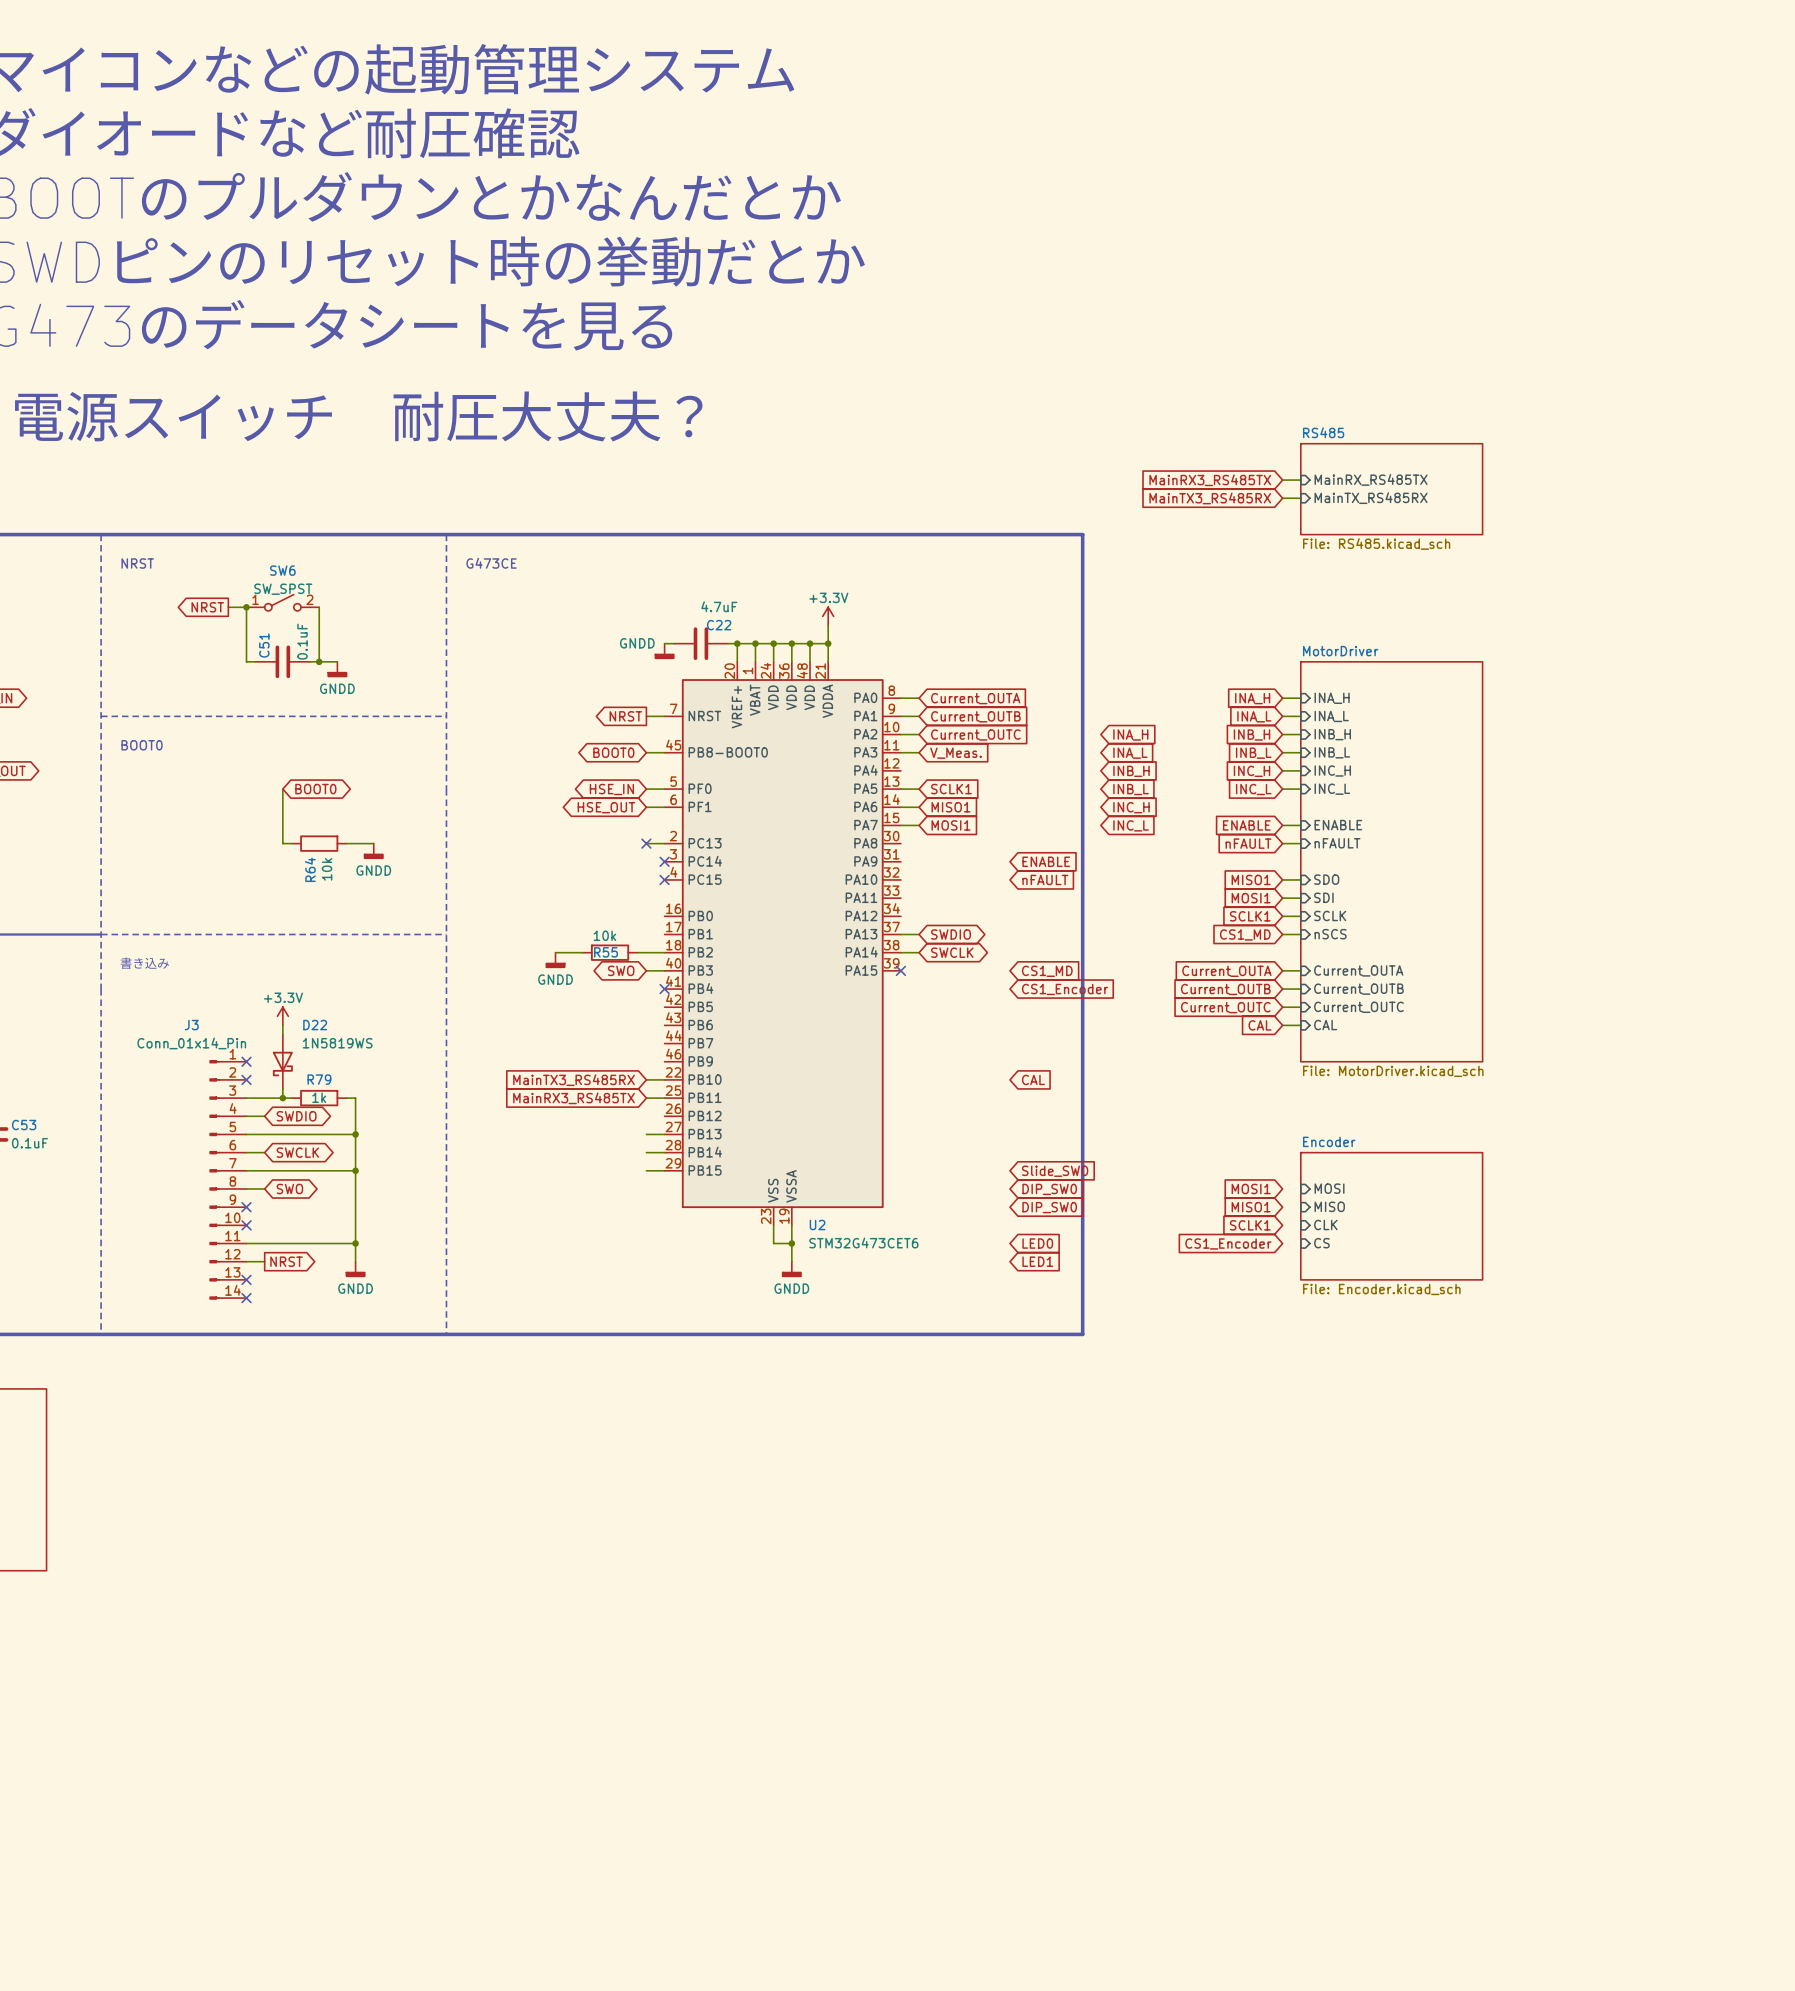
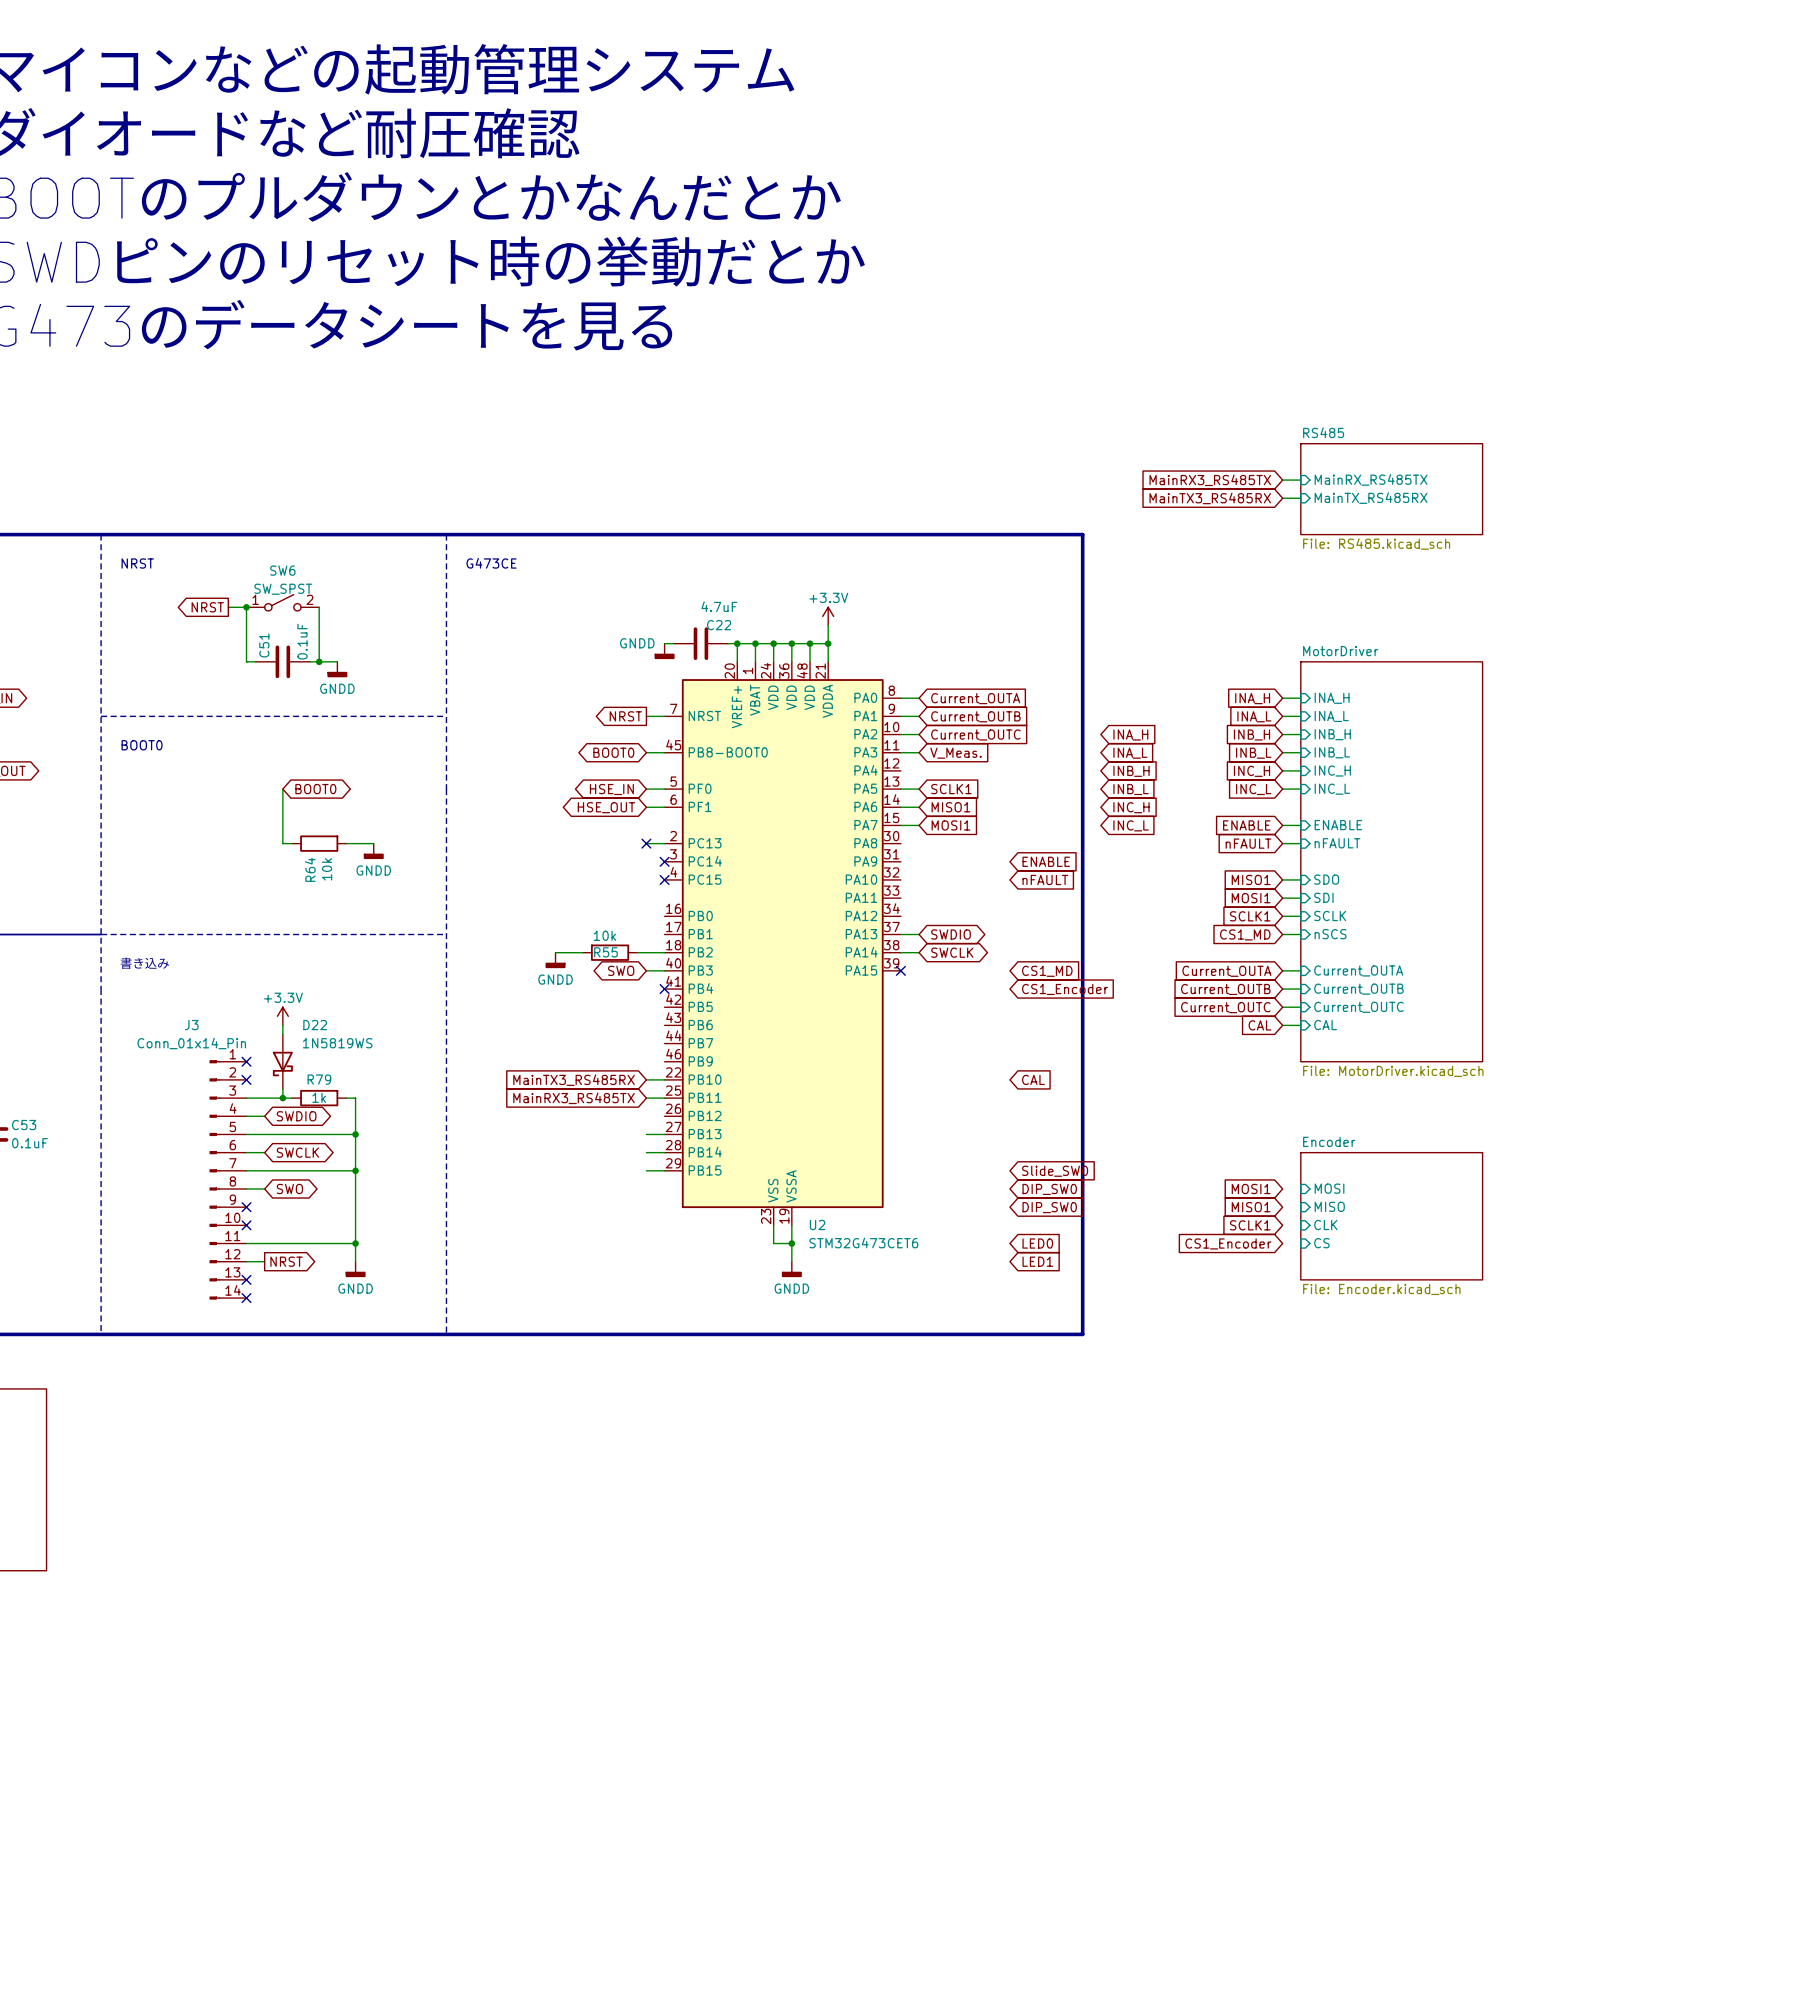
text: 電源スイッチ 耐圧大丈夫？ (358, 416) -> none

